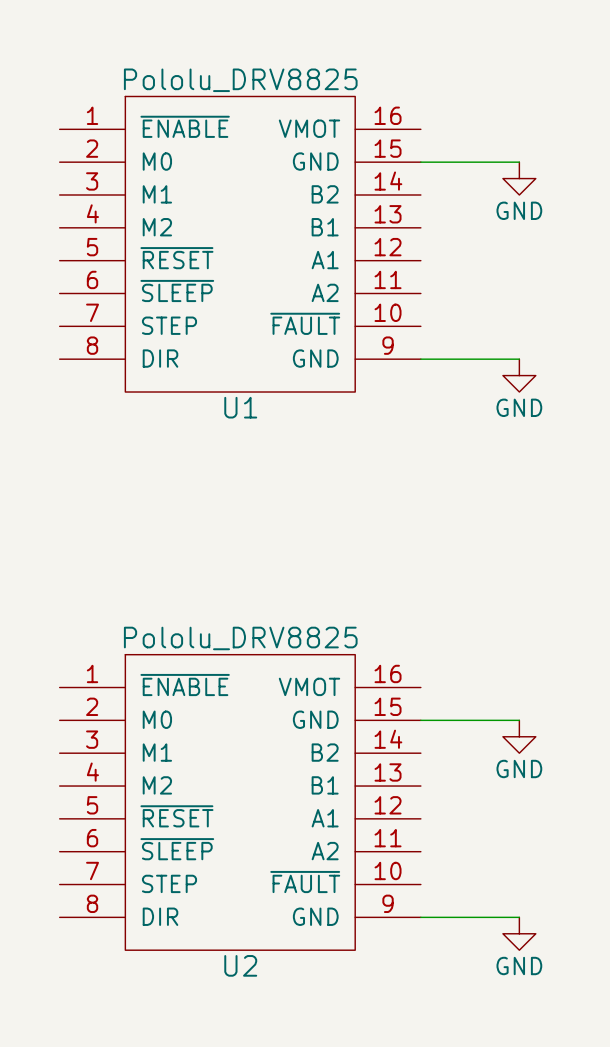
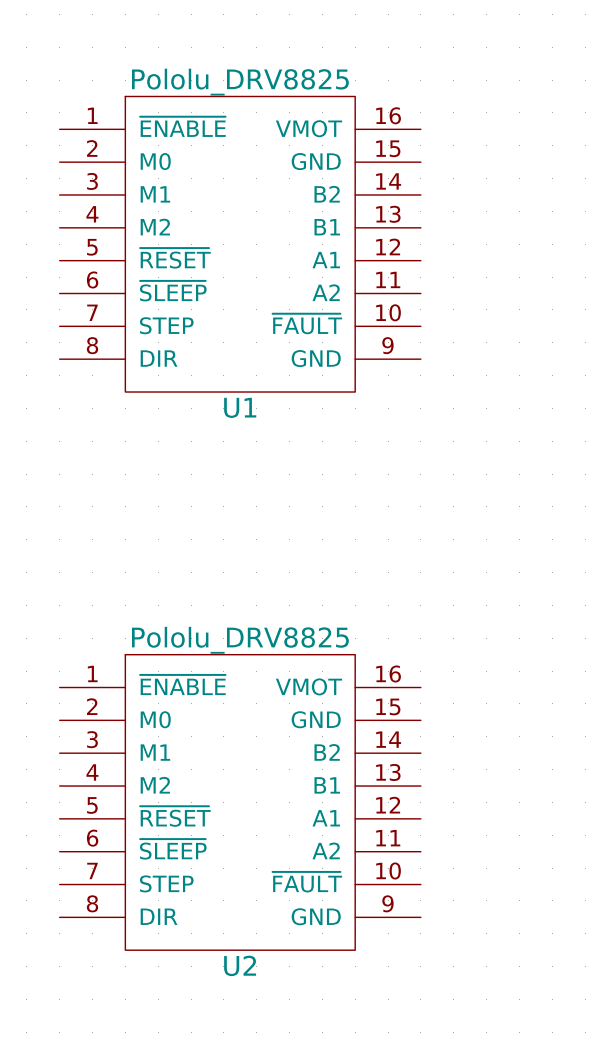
wire: (420, 162) (519, 162) -> none
power symbol: GND (519, 178) -> none
wire: (420, 359) (519, 359) -> none
power symbol: GND (519, 375) -> none
wire: (420, 720) (519, 720) -> none
power symbol: GND (519, 736) -> none
wire: (420, 917) (519, 917) -> none
power symbol: GND (519, 933) -> none

